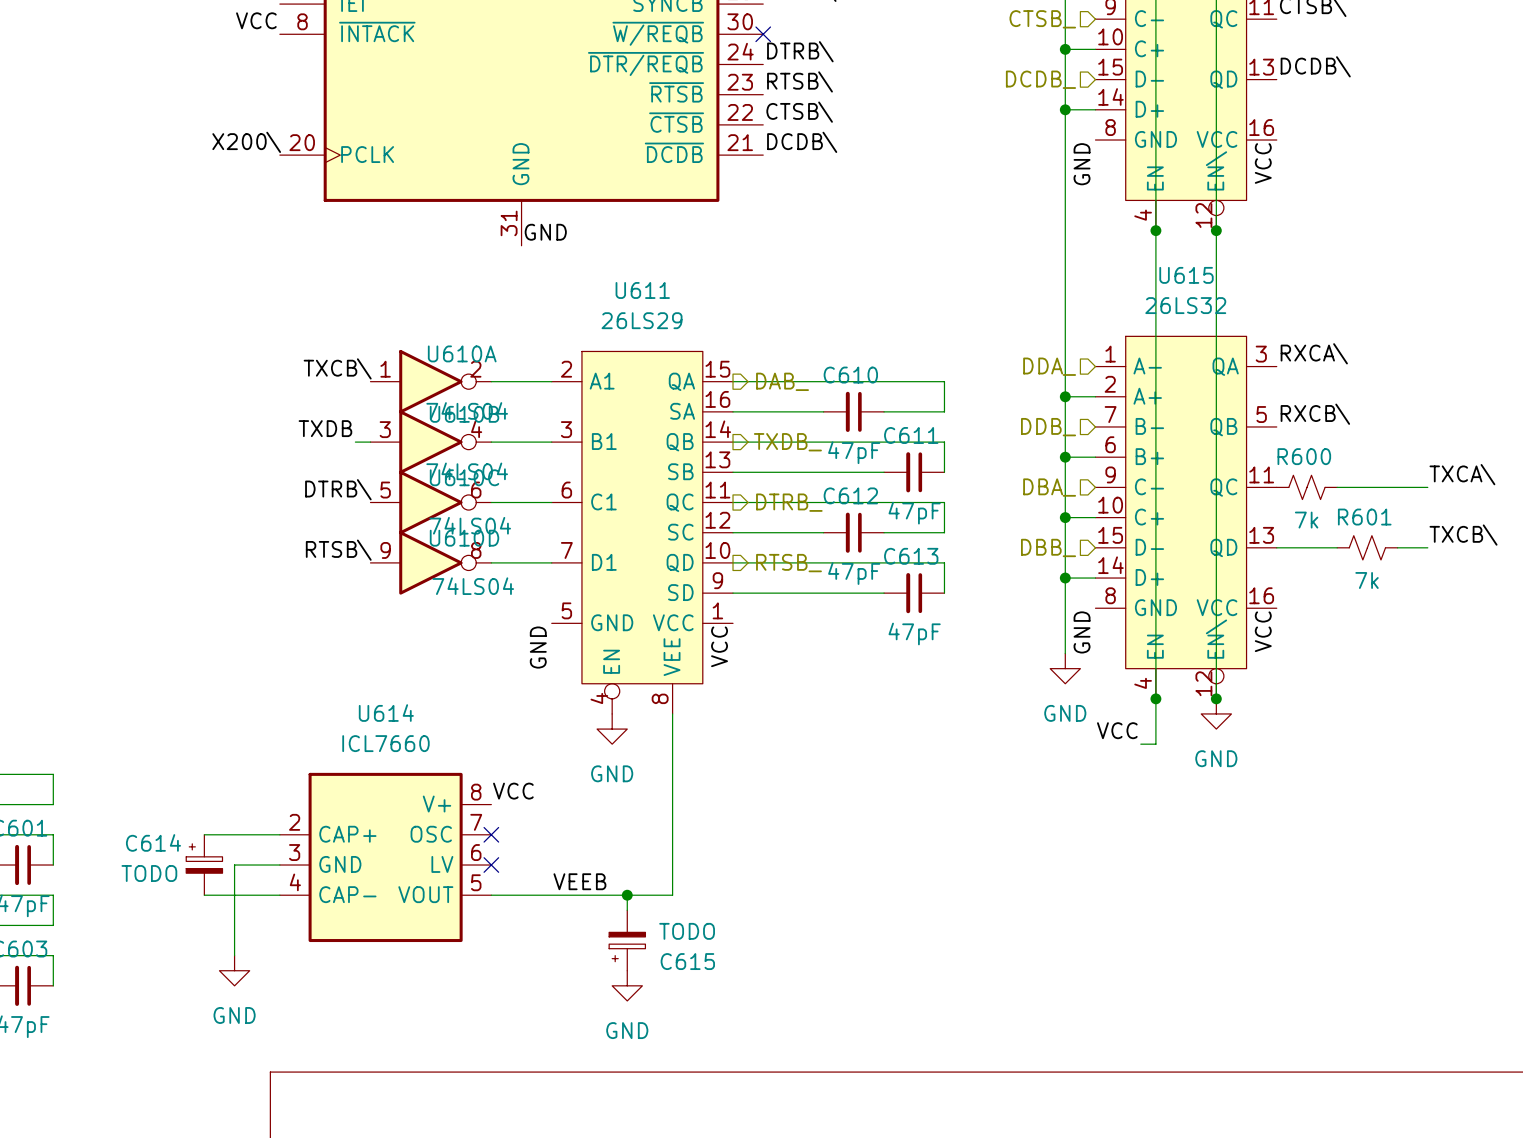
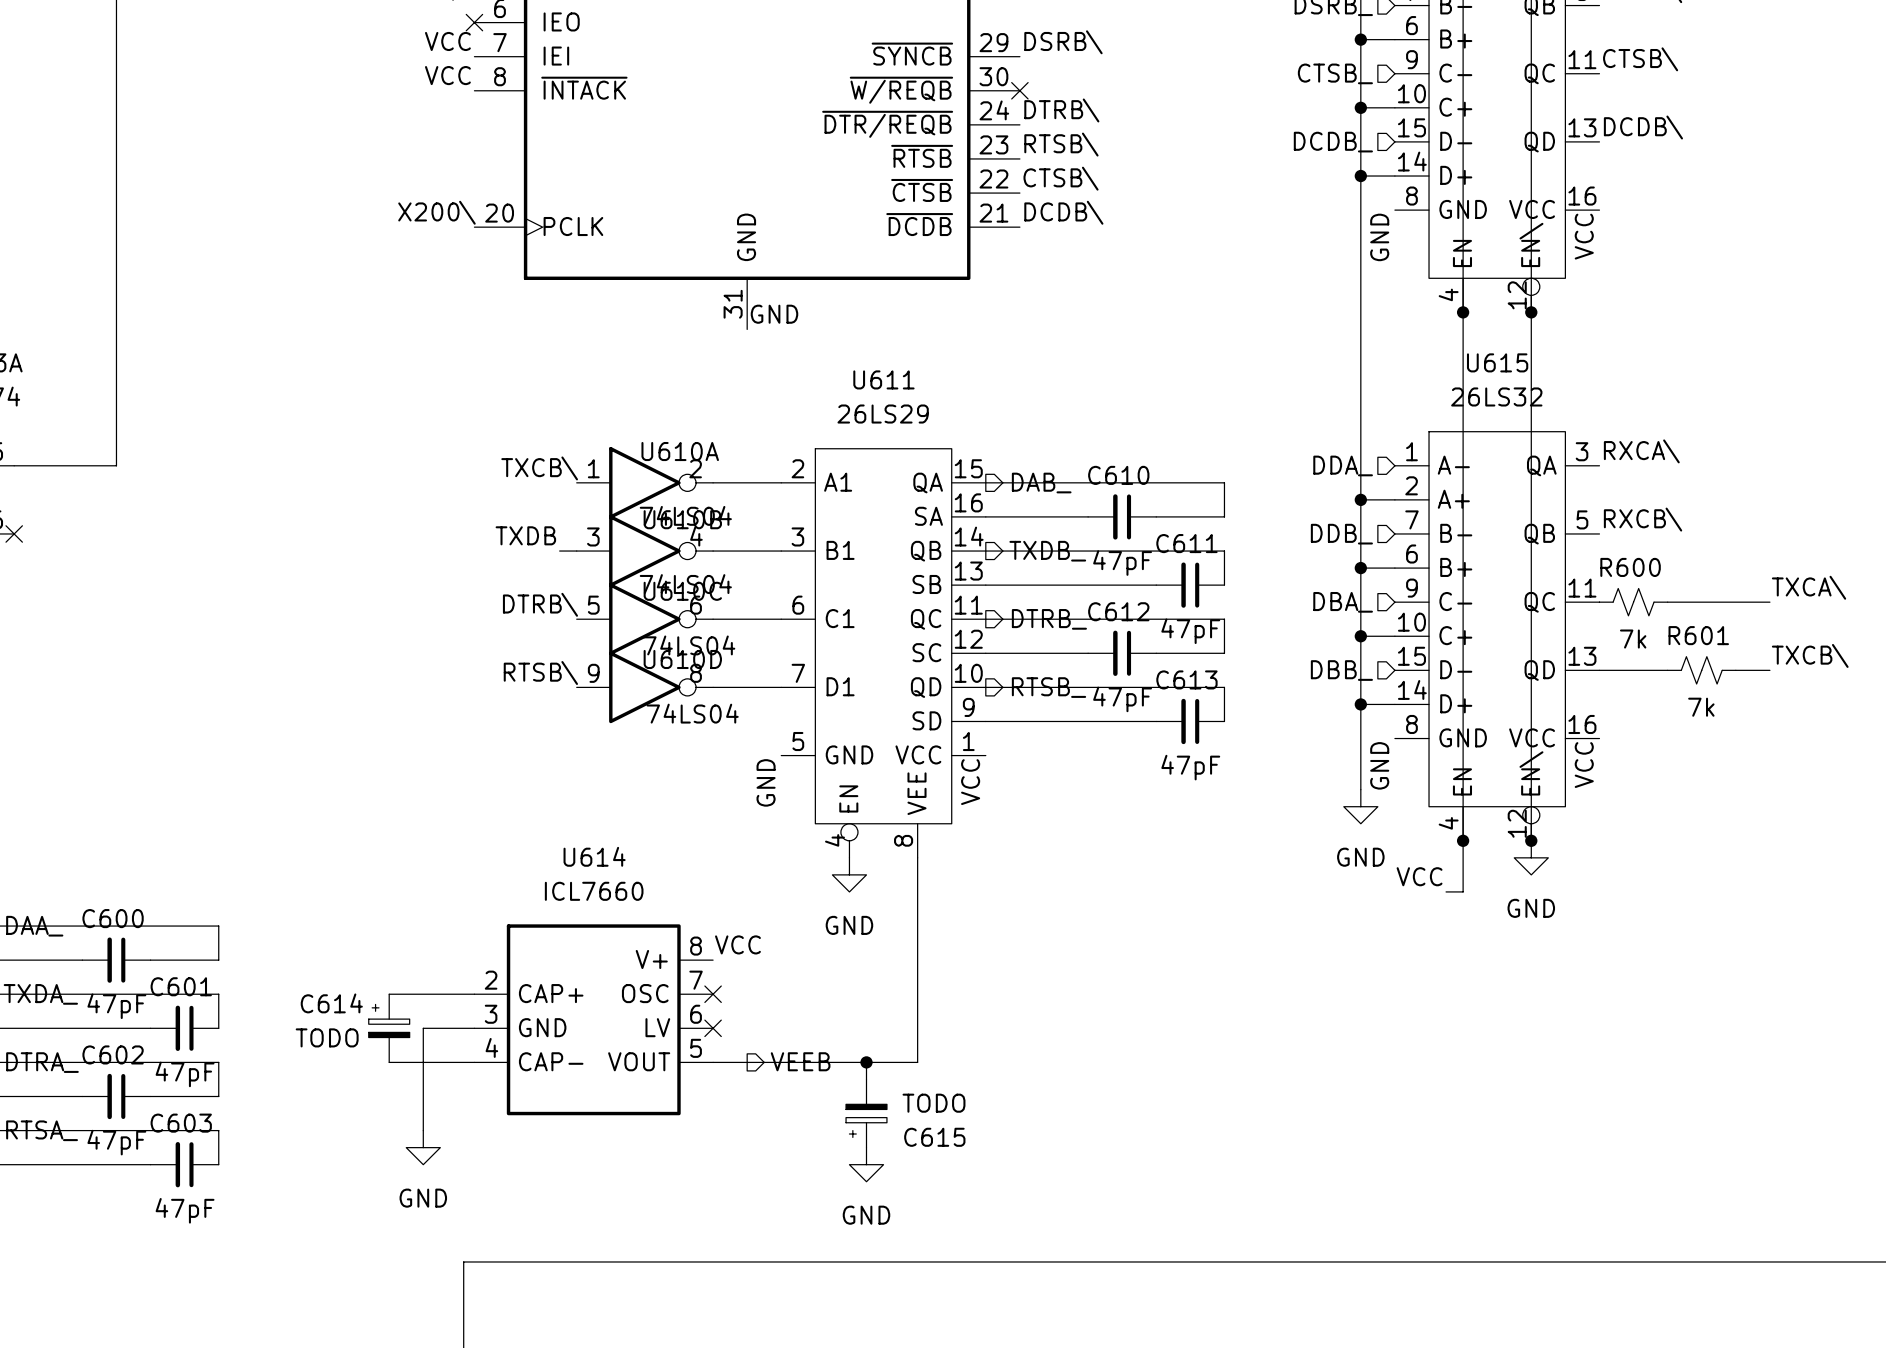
label: VEEB (579, 881) -> none
hierarchical label: none -> VEEB (800, 1061)

